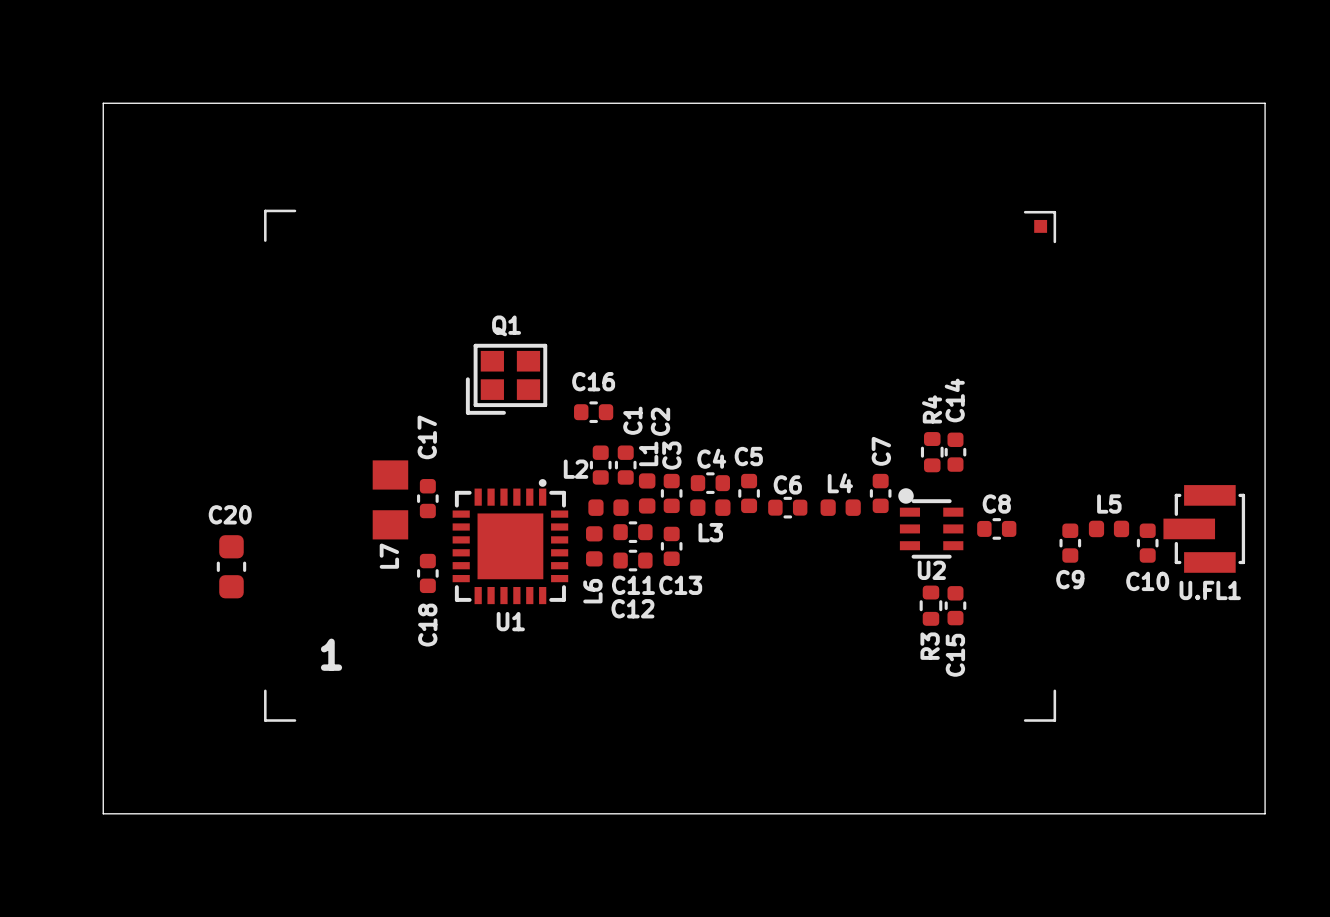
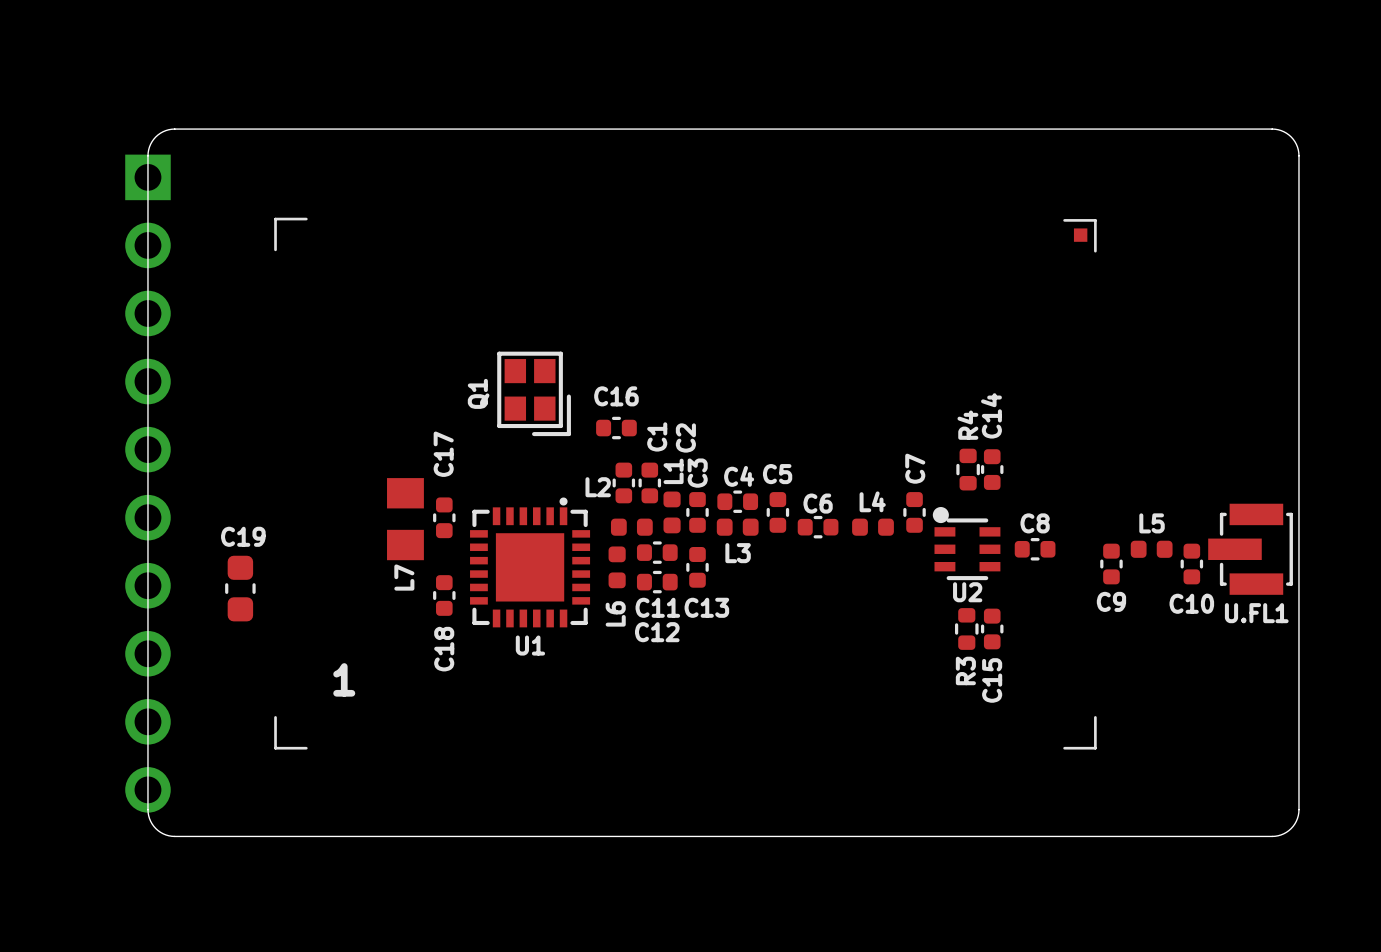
board edge: (103, 103) (1265, 103) (1265, 813) (103, 813) (103, 103) -> (174, 129) (165, 130) (155, 136) (149, 147) (147, 155) (147, 809) (152, 823) (160, 832) (174, 836) (1272, 836) (1286, 832) (1294, 823) (1298, 809) (1298, 155) (1294, 141) (1286, 133) (1272, 129) (174, 129)
Q1 rotation: 0° (506, 379) -> 90° counterclockwise (534, 393)
part: none -> (147, 483)
C20 name: C20 (230, 514) -> C19 (243, 536)

